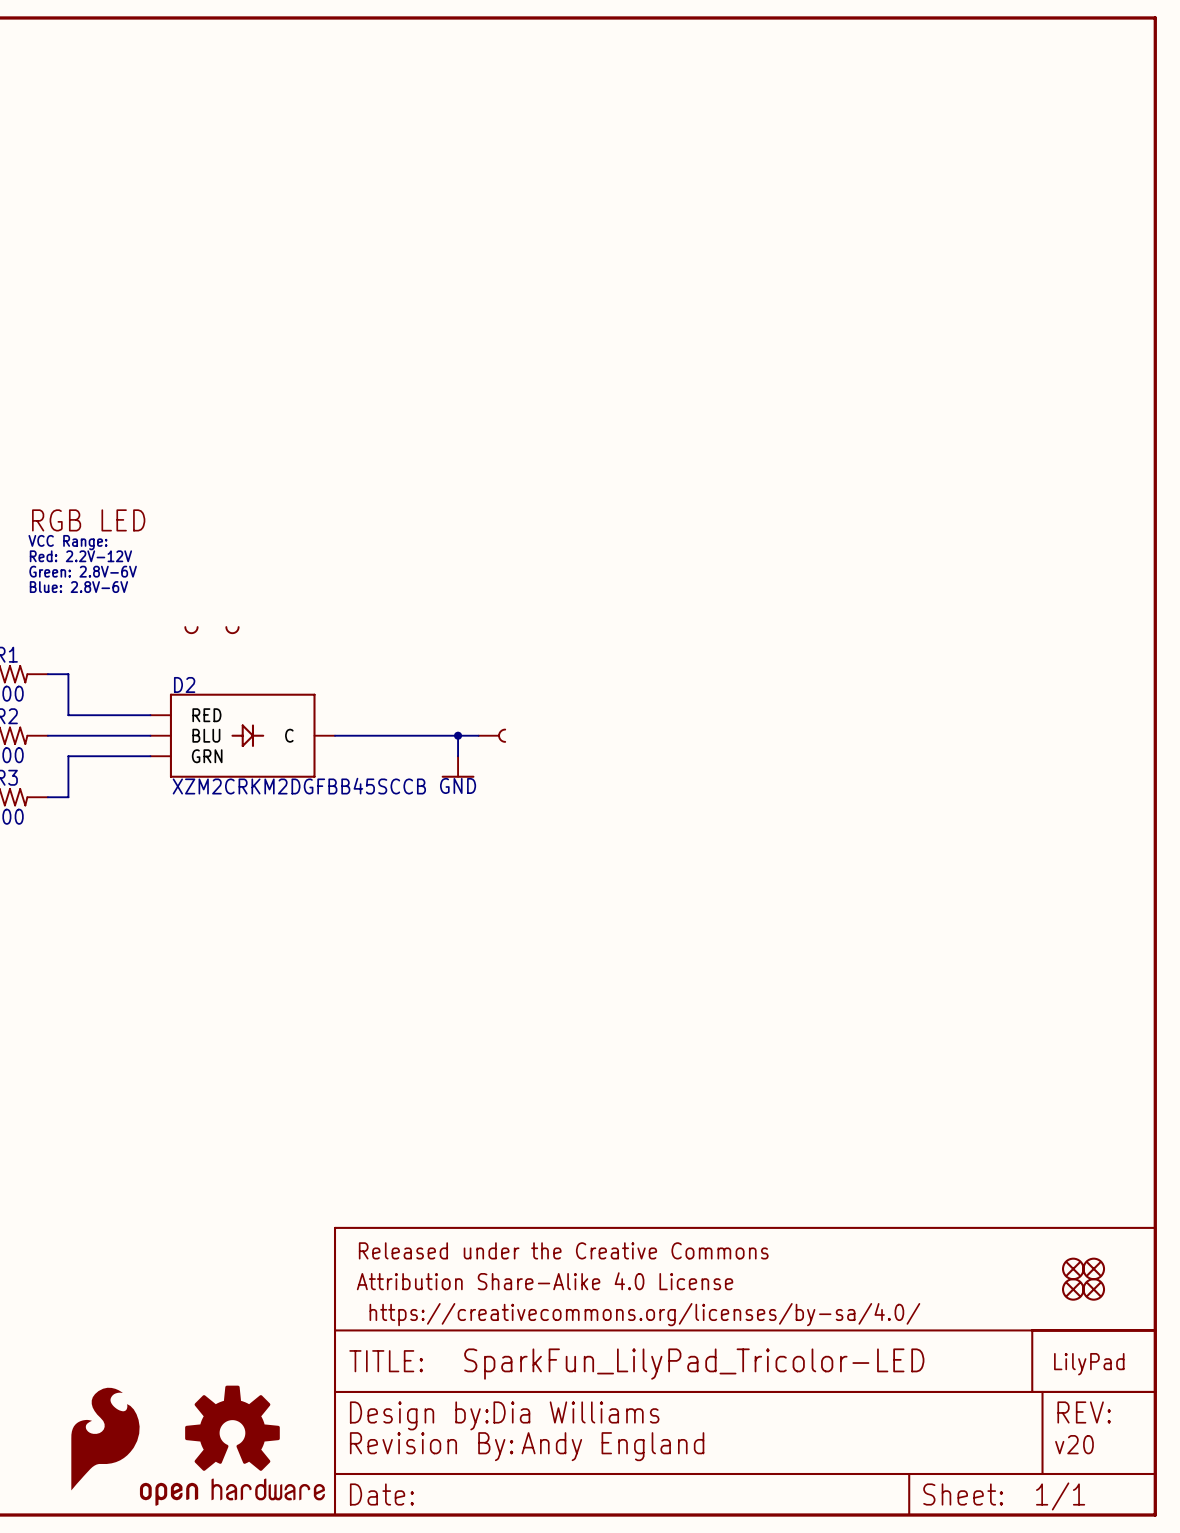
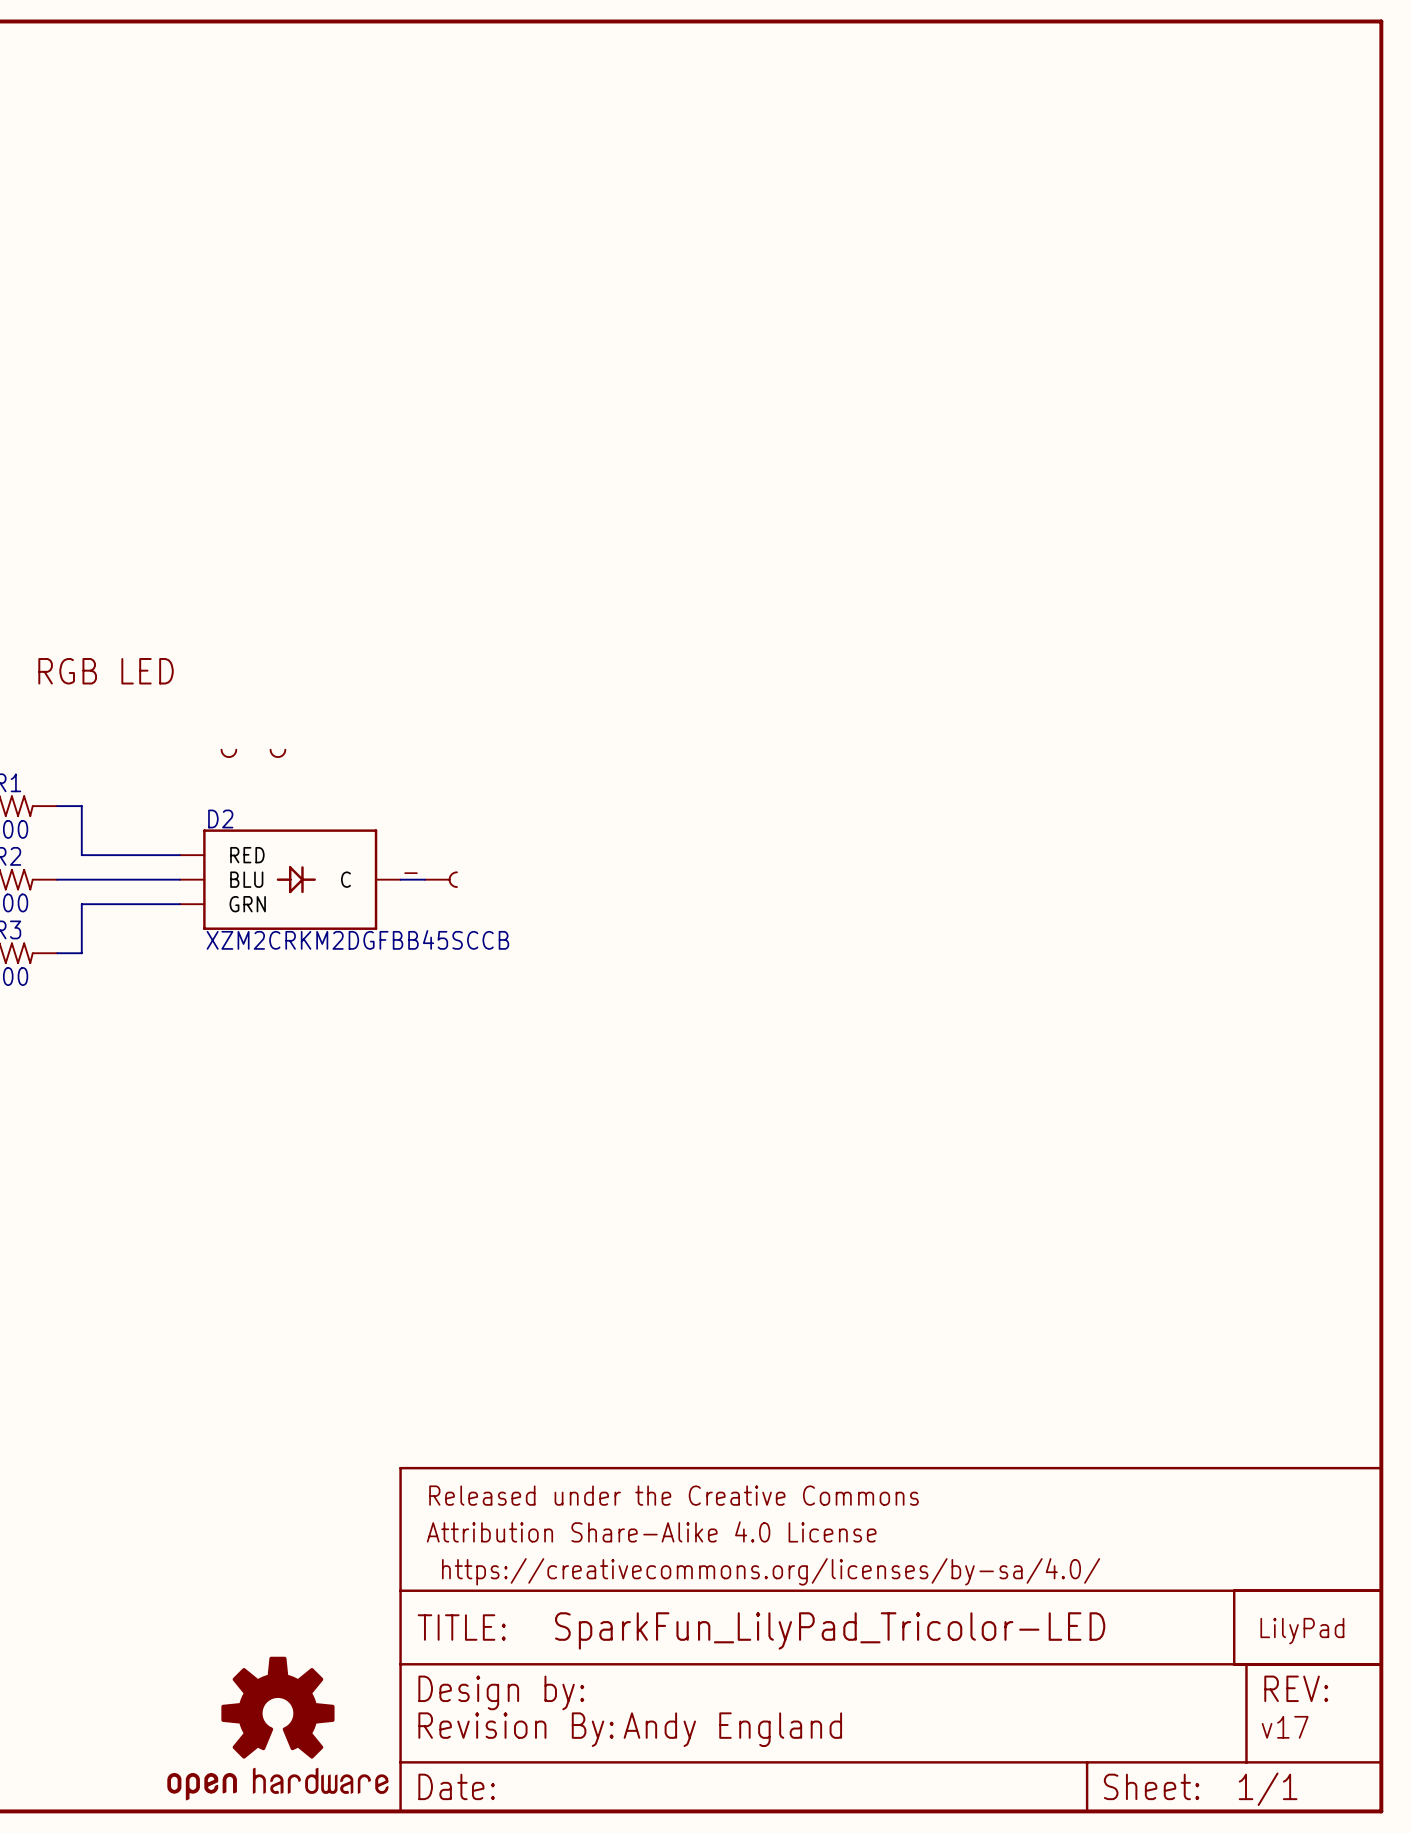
text position: RGB LED (88, 520) -> RGB LED (106, 671)
text: VCC Range: (67, 542) -> none
text: Red: 2.2V-12V (80, 556) -> none
text: Green: 2.8V-6V (83, 571) -> none
text: Blue: 2.8V-6V (78, 587) -> none
label: none -> - (411, 873)
wire: (355, 735) (478, 735) -> none
wire: (458, 735) (458, 756) -> none
junction: (458, 735) -> none
part position: (491, 735) -> (441, 879)
power symbol: GND (458, 767) -> none
part: (1073, 1268) -> none
part: (1093, 1268) -> none
part: (1073, 1289) -> none
part: (1093, 1289) -> none
text: Dia Williams (576, 1412) -> none
part: (105, 1439) -> none
text: v20 (1074, 1444) -> v17 (1285, 1727)

